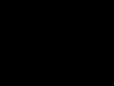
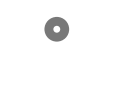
via: none -> (56, 29)

